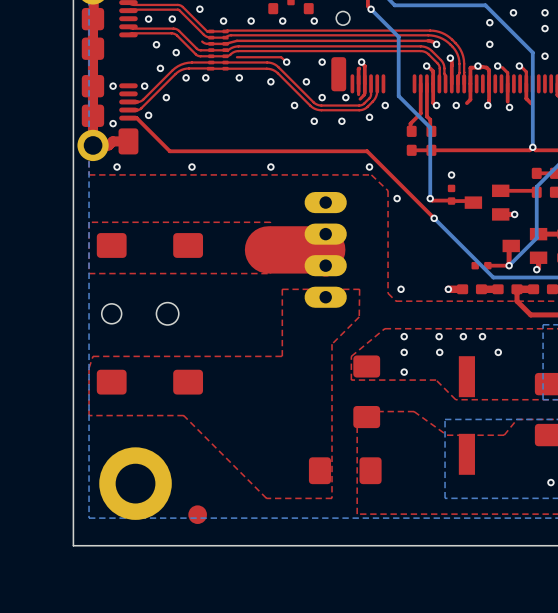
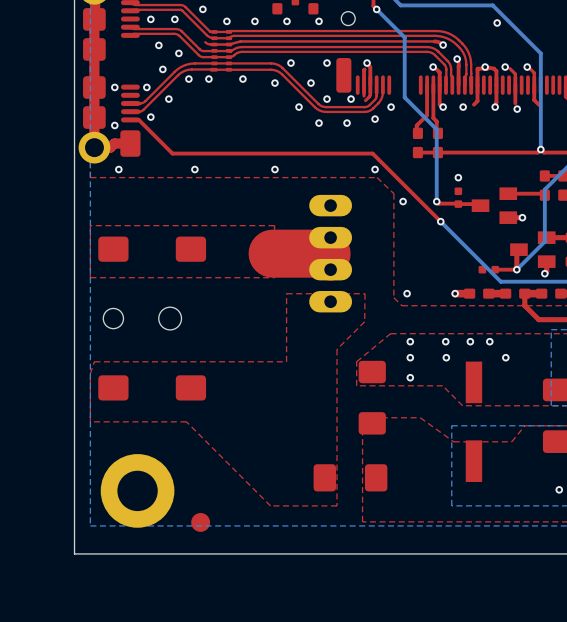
via: (513, 12) -> none
via: (545, 12) -> none
via: (545, 28) -> none
via: (489, 44) -> none
via: (545, 56) -> none
top track: (236, 57) (281, 57) (286, 62) -> none

